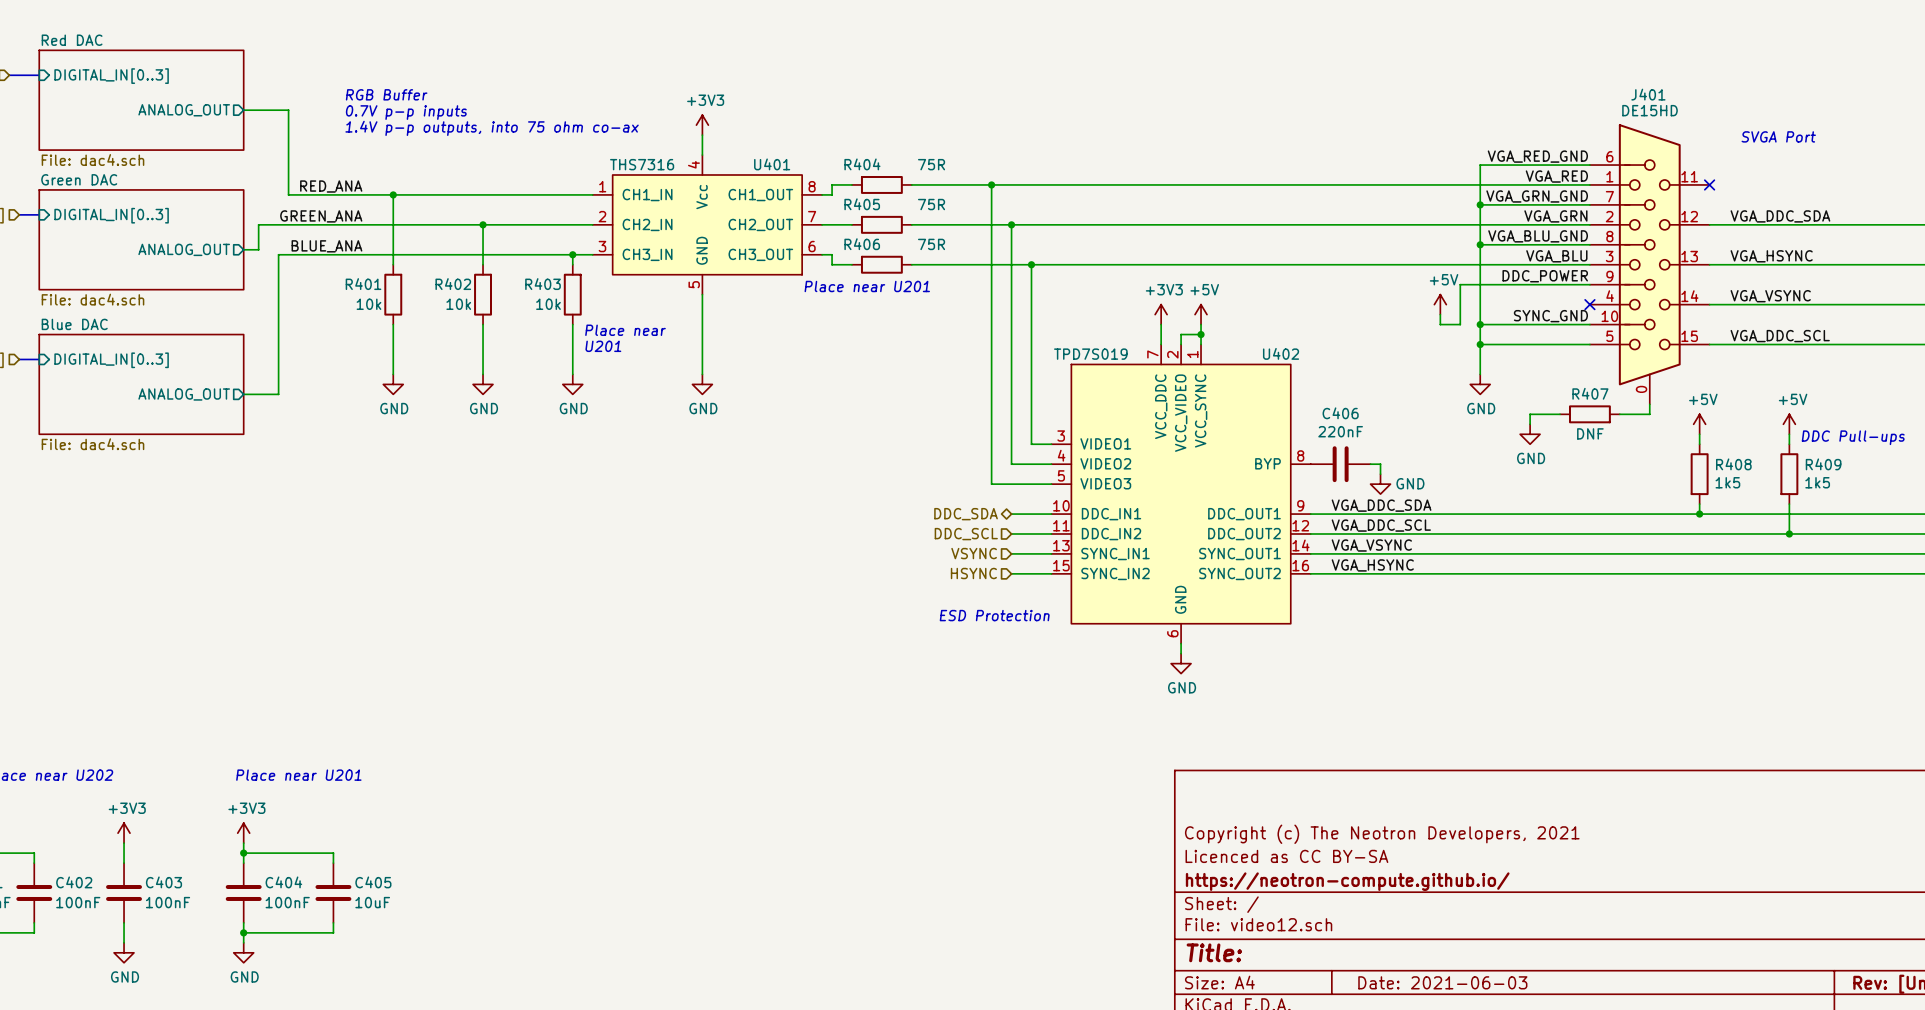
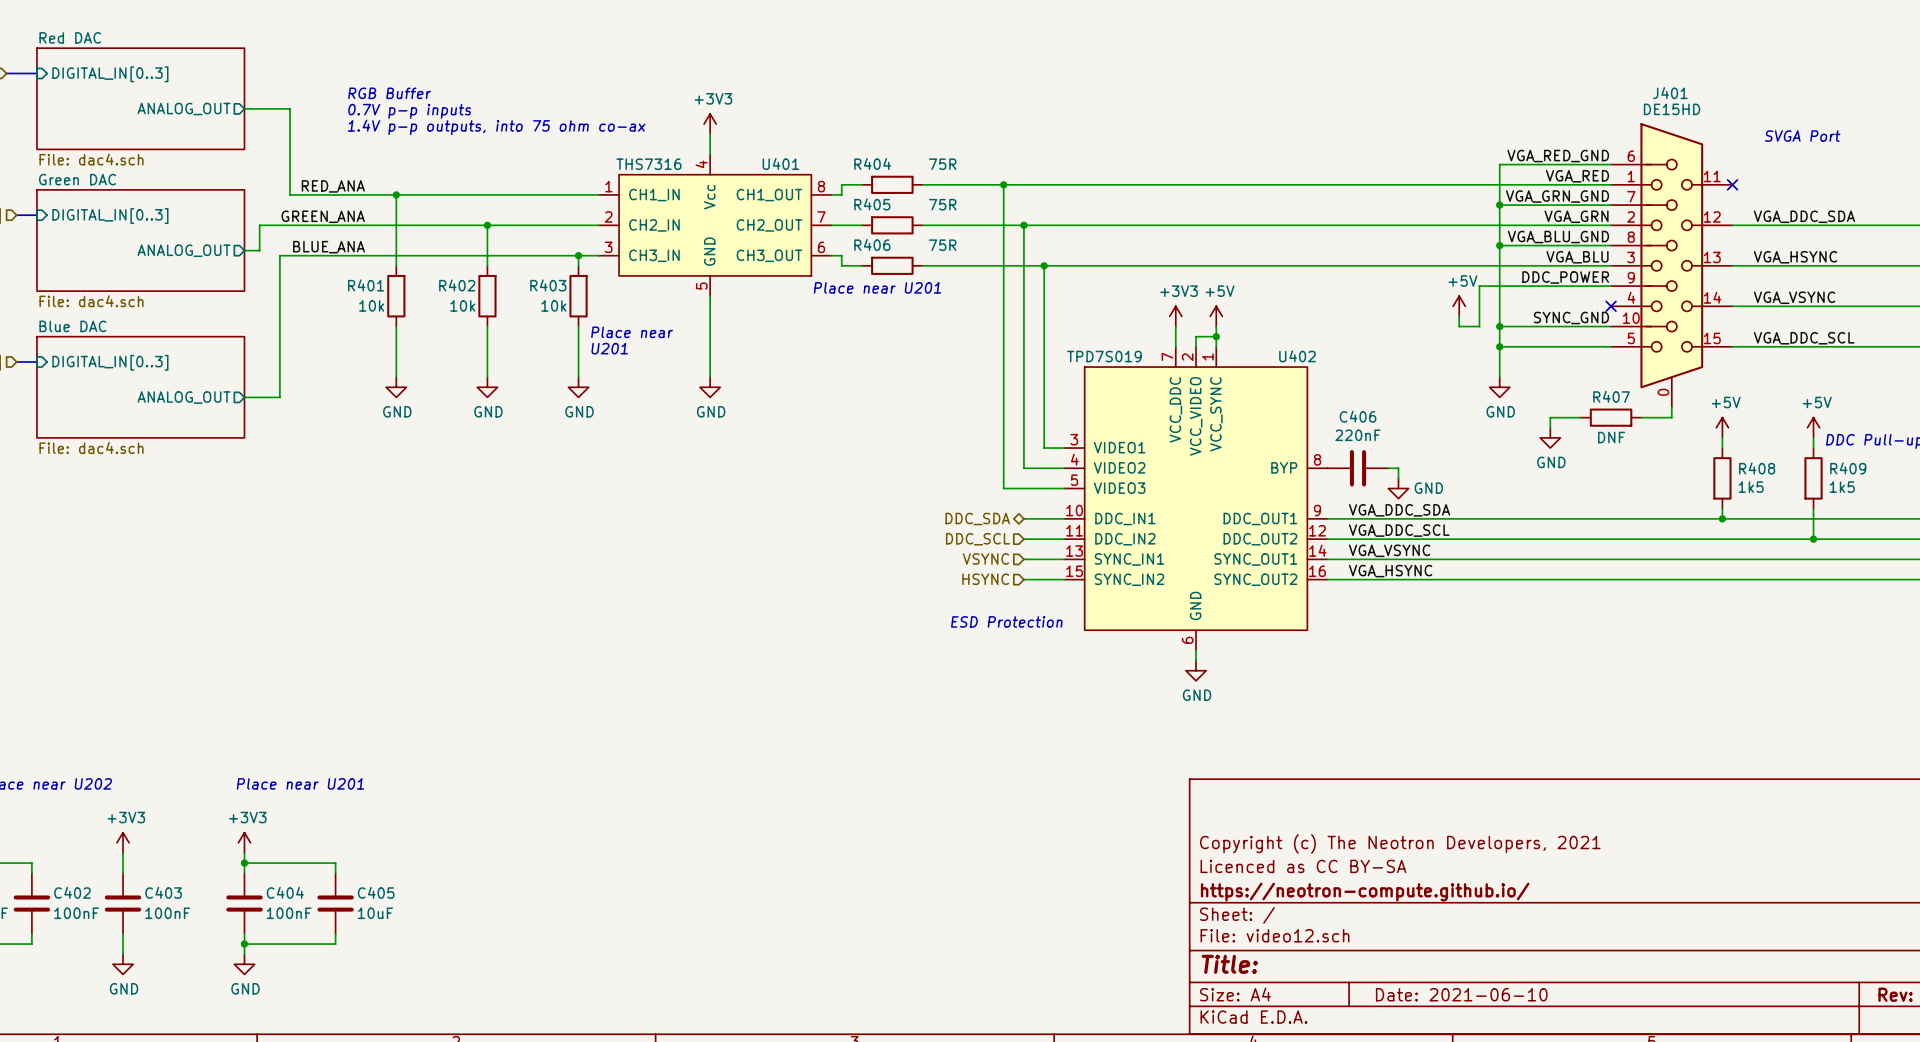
title block: Date: 2021-06-03 (1442, 982) -> Date: 2021-06-10 (1461, 994)

